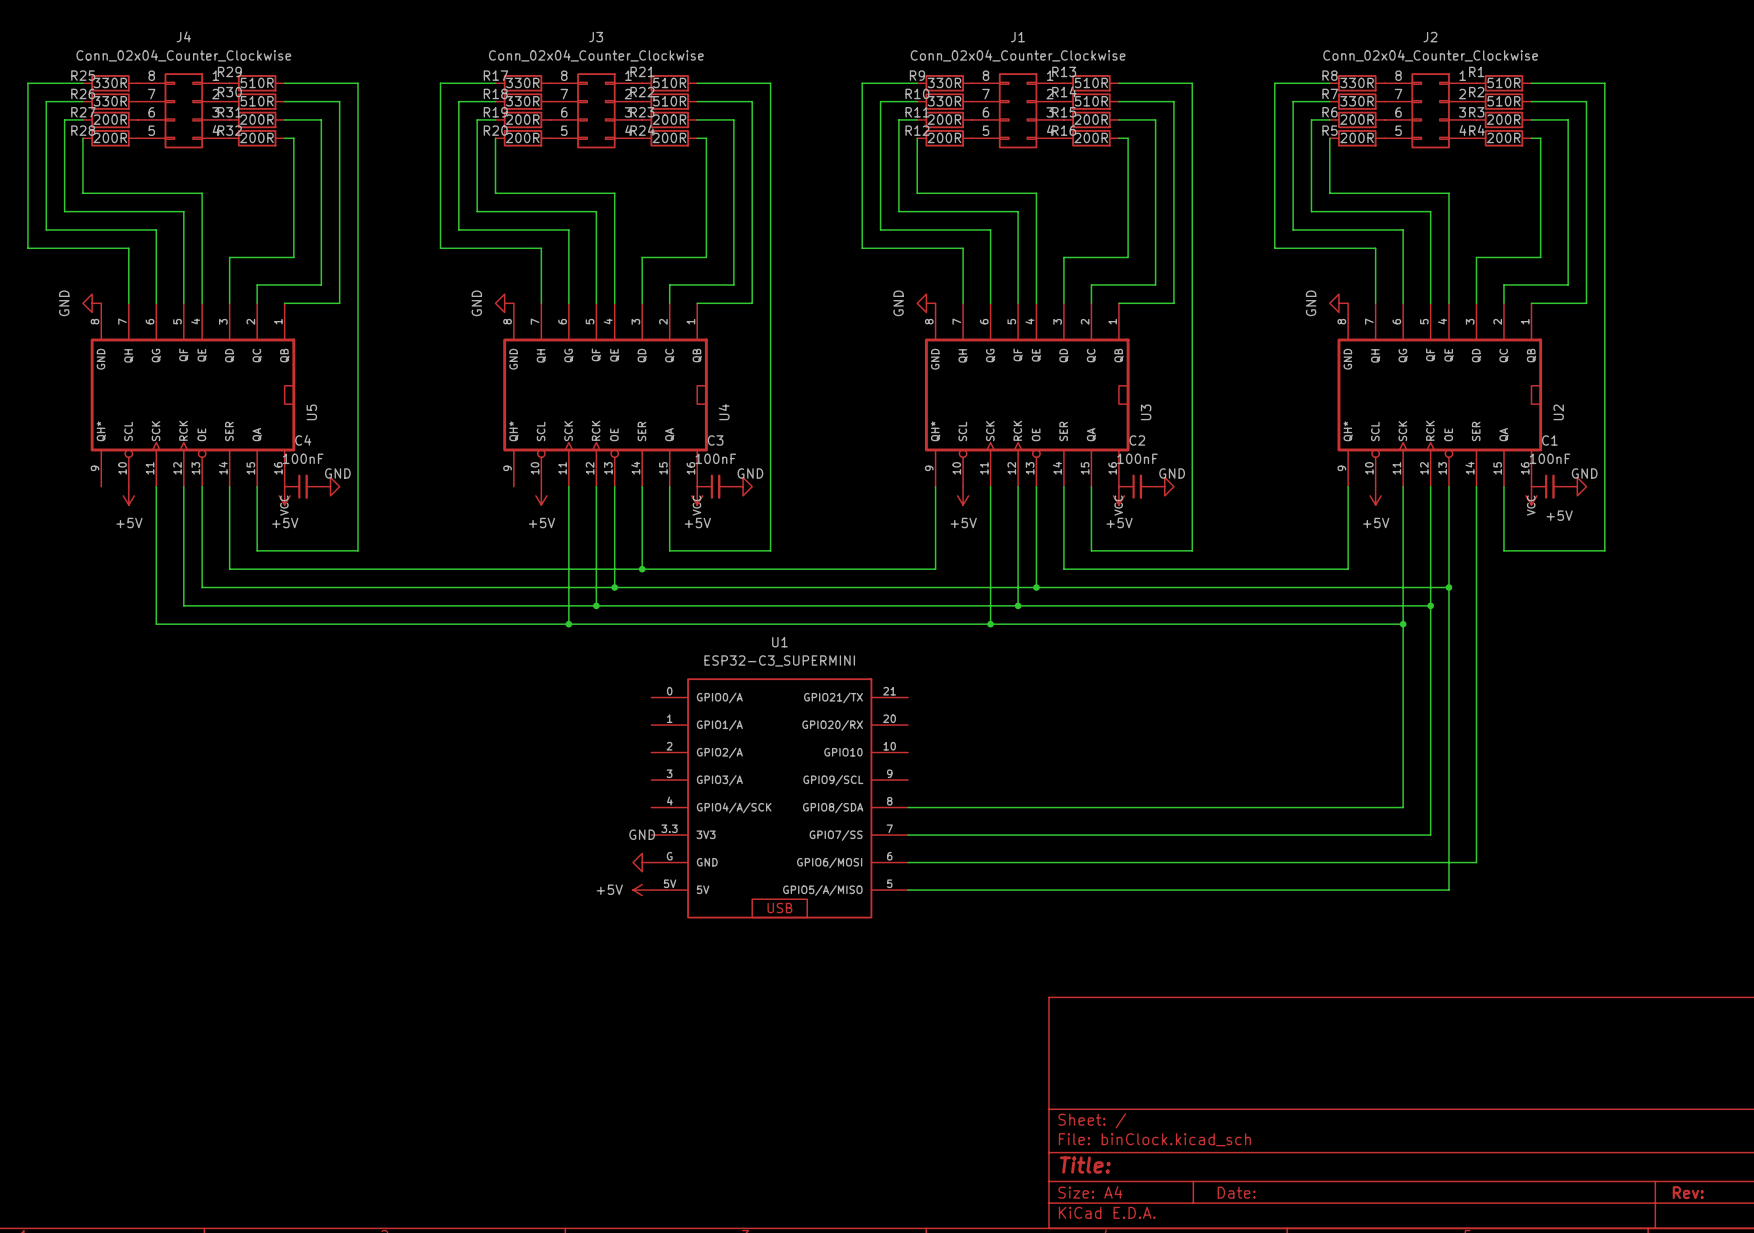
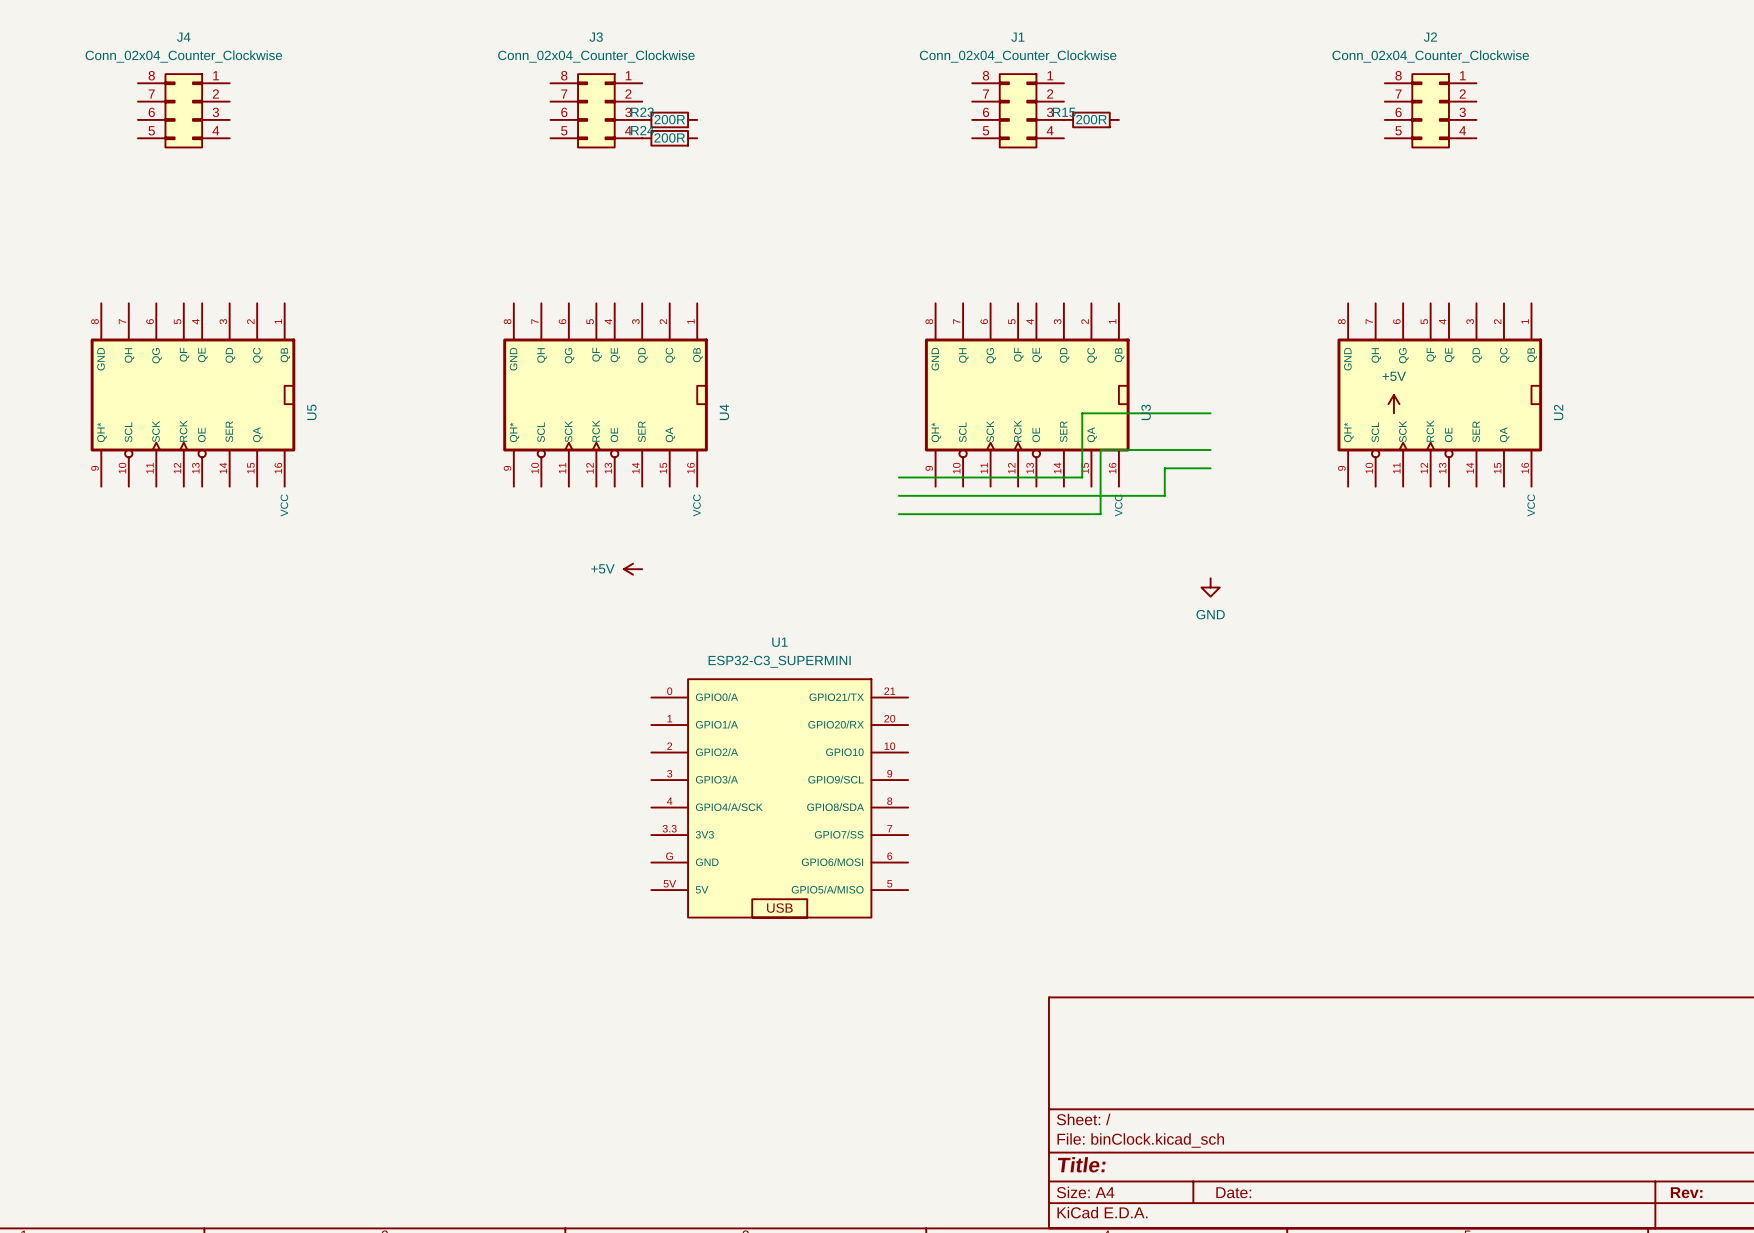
wire: (82, 83) (27, 83) (27, 248) (128, 248) (128, 303) -> none
R25: 330R (110, 83) -> none
R29: 510R (257, 83) -> none
wire: (284, 83) (358, 83) (358, 550) (257, 550) (257, 486) -> none
wire: (495, 83) (440, 83) (440, 248) (541, 248) (541, 303) -> none
R17: 330R (523, 83) -> none
R21: 510R (669, 83) -> none
wire: (697, 83) (770, 83) (770, 550) (669, 550) (669, 486) -> none
wire: (917, 83) (862, 83) (862, 248) (963, 248) (963, 303) -> none
R9: 330R (944, 83) -> none
R13: 510R (1091, 83) -> none
wire: (1118, 83) (1192, 83) (1192, 550) (1091, 550) (1091, 486) -> none
wire: (1329, 83) (1274, 83) (1274, 248) (1375, 248) (1375, 303) -> none
R8: 330R (1357, 83) -> none
R1: 510R (1503, 83) -> none
wire: (1531, 83) (1604, 83) (1604, 550) (1503, 550) (1503, 486) -> none
wire: (82, 101) (46, 101) (46, 229) (156, 229) (156, 303) -> none
R26: 330R (110, 101) -> none
R30: 510R (257, 101) -> none
wire: (284, 101) (339, 101) (339, 303) (284, 303) -> none
wire: (495, 101) (458, 101) (458, 229) (568, 229) (568, 303) -> none
R18: 330R (523, 101) -> none
R22: 510R (669, 101) -> none
wire: (697, 101) (752, 101) (752, 303) (697, 303) -> none
wire: (917, 101) (880, 101) (880, 229) (990, 229) (990, 303) -> none
R10: 330R (944, 101) -> none
R14: 510R (1091, 101) -> none
wire: (1118, 101) (1173, 101) (1173, 303) (1118, 303) -> none
wire: (1329, 101) (1293, 101) (1293, 229) (1403, 229) (1403, 303) -> none
R7: 330R (1357, 101) -> none
R2: 510R (1503, 101) -> none
wire: (1531, 101) (1586, 101) (1586, 303) (1531, 303) -> none
wire: (82, 119) (64, 119) (64, 211) (183, 211) (183, 303) -> none
R27: 200R (110, 119) -> none
R31: 200R (257, 119) -> none
wire: (284, 119) (321, 119) (321, 284) (257, 284) (257, 303) -> none
wire: (495, 119) (477, 119) (477, 211) (596, 211) (596, 303) -> none
R19: 200R (523, 119) -> none
wire: (697, 119) (733, 119) (733, 284) (669, 284) (669, 303) -> none
wire: (917, 119) (898, 119) (898, 211) (1018, 211) (1018, 303) -> none
R11: 200R (944, 119) -> none
wire: (1118, 119) (1155, 119) (1155, 284) (1091, 284) (1091, 303) -> none
wire: (1329, 119) (1311, 119) (1311, 211) (1430, 211) (1430, 303) -> none
R6: 200R (1357, 119) -> none
R3: 200R (1503, 119) -> none
wire: (1531, 119) (1568, 119) (1568, 284) (1503, 284) (1503, 303) -> none
wire: (82, 138) (82, 193) (202, 193) (202, 303) -> none
R28: 200R (110, 138) -> none
R32: 200R (257, 138) -> none
wire: (284, 138) (293, 138) (293, 257) (229, 257) (229, 303) -> none
wire: (495, 138) (495, 193) (614, 193) (614, 303) -> none
R20: 200R (523, 138) -> none
wire: (697, 138) (706, 138) (706, 257) (642, 257) (642, 303) -> none
wire: (917, 138) (917, 193) (1036, 193) (1036, 303) -> none
R12: 200R (944, 138) -> none
R16: 200R (1091, 138) -> none
wire: (1118, 138) (1128, 138) (1128, 257) (1063, 257) (1063, 303) -> none
wire: (1329, 138) (1329, 193) (1448, 193) (1448, 303) -> none
R5: 200R (1357, 138) -> none
R4: 200R (1503, 138) -> none
wire: (1531, 138) (1540, 138) (1540, 257) (1476, 257) (1476, 303) -> none
power symbol: GND (92, 303) -> none
power symbol: GND (504, 303) -> none
power symbol: GND (926, 303) -> none
power symbol: GND (1338, 303) -> none
power symbol: none -> +5V (1393, 404)
wire: none -> (1210, 413) (1082, 413) (1082, 477) (898, 477)
wire: none -> (1210, 450) (1100, 450) (1100, 514) (898, 514)
wire: none -> (1210, 468) (1164, 468) (1164, 495) (898, 495)
power symbol text position: GND (1172, 473) -> GND (1210, 614)
wire: (156, 486) (156, 624) (1403, 624) -> none
wire: (183, 486) (183, 605) (1430, 605) -> none
wire: (202, 486) (202, 587) (1448, 587) -> none
wire: (229, 486) (229, 569) (935, 569) (935, 486) -> none
C4: 100nF (302, 486) -> none
power symbol: GND (330, 486) -> none
wire: (568, 486) (568, 624) -> none
wire: (596, 486) (596, 605) -> none
wire: (614, 486) (614, 587) -> none
wire: (642, 486) (642, 569) -> none
C3: 100nF (715, 486) -> none
power symbol: GND (743, 486) -> none
wire: (990, 486) (990, 624) -> none
wire: (1018, 486) (1018, 605) -> none
wire: (1036, 486) (1036, 587) -> none
wire: (1063, 486) (1063, 569) (1348, 569) (1348, 486) -> none
C2: 100nF (1137, 486) -> none
power symbol rotation: 0° (1164, 486) -> 90° clockwise (1210, 587)
power symbol position: GND (1164, 486) -> GND (1210, 587)
wire: (1403, 486) (1403, 807) (908, 807) -> none
wire: (1430, 486) (1430, 835) (908, 835) -> none
wire: (1448, 486) (1448, 890) (908, 890) -> none
wire: (1476, 486) (1476, 862) (908, 862) -> none
C1: 100nF (1549, 486) -> none
power symbol: GND (1577, 486) -> none
power symbol: +5V (128, 495) -> none
power symbol: +5V (284, 495) -> none
power symbol: +5V (541, 495) -> none
power symbol: +5V (697, 495) -> none
power symbol: +5V (963, 495) -> none
power symbol: +5V (1118, 495) -> none
power symbol: +5V (1375, 495) -> none
power symbol: +5V (1531, 495) -> none
power symbol: none -> +5V (633, 569)
junction: (642, 569) -> none
junction: (614, 587) -> none
junction: (1036, 587) -> none
junction: (1448, 587) -> none
junction: (596, 605) -> none
junction: (1018, 605) -> none
junction: (1430, 605) -> none
junction: (568, 624) -> none
junction: (990, 624) -> none
junction: (1403, 624) -> none
power symbol: GND (642, 862) -> none
power symbol: +5V (642, 890) -> none

